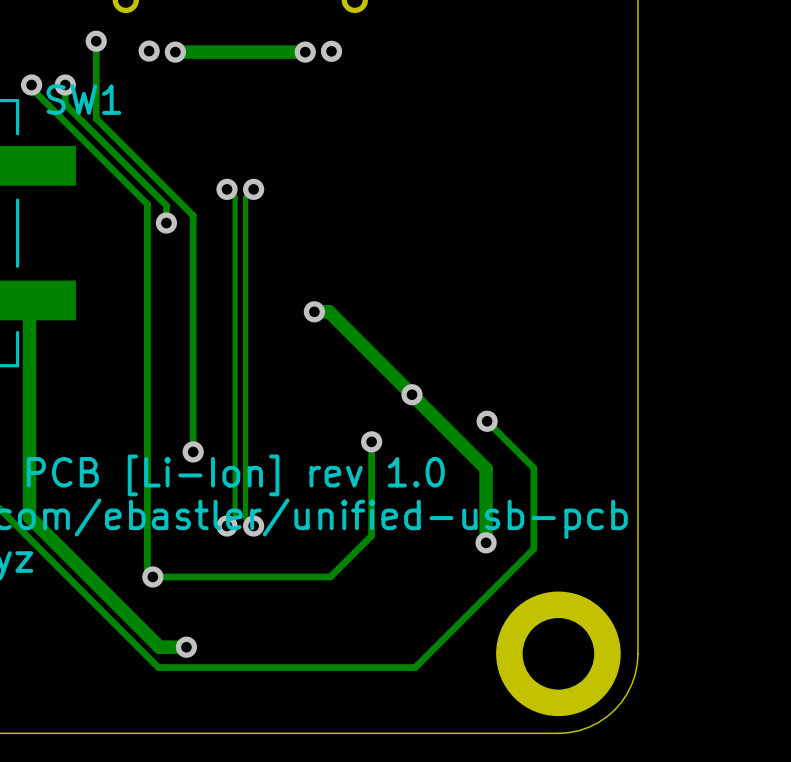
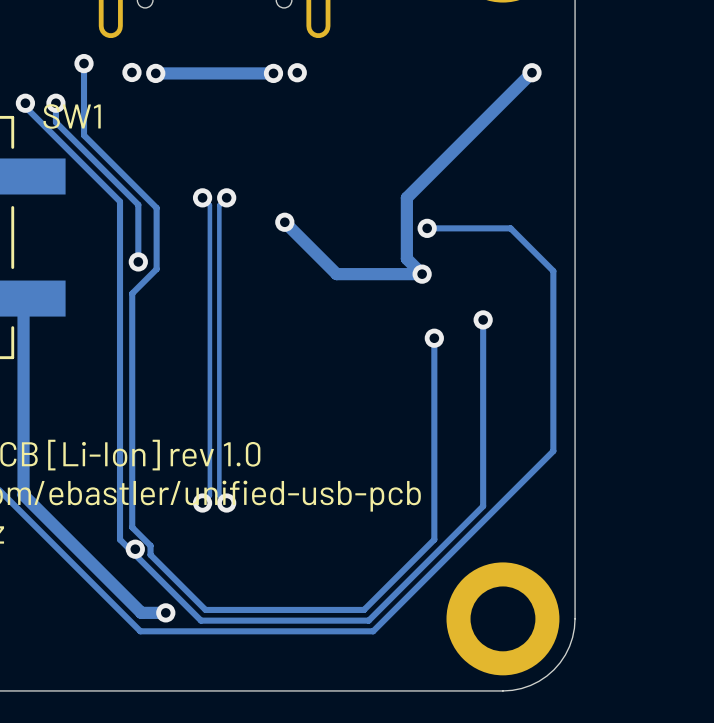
track: none -> (531, 72) (406, 197) (406, 258) (422, 274) (336, 274) (284, 222)
via: none -> (531, 72)
track: (31, 88) (147, 204) (147, 571) (152, 576) (330, 576) (371, 535) (371, 441) -> (25, 106) (120, 201) (120, 539) (201, 620) (368, 620) (483, 506) (483, 319)
track: (65, 104) (166, 205) (166, 223) -> (55, 120) (138, 204) (138, 261)
track: (96, 118) (193, 215) (193, 451) -> (84, 133) (156, 207) (156, 269) (132, 293) (132, 527) (150, 545) (150, 554) (205, 609) (364, 609) (434, 539) (434, 338)
via: none -> (284, 222)
via position: (166, 223) -> (138, 261)
via: none -> (427, 228)
via: none -> (422, 274)
track: (314, 311) (329, 311) (486, 468) (486, 542) -> none
via: (314, 311) -> none
via: none -> (483, 319)
via: none -> (434, 338)
via: (412, 394) -> none
track: (487, 421) (533, 468) (533, 548) -> (427, 228) (510, 228) (553, 271) (553, 451) (480, 523)
via: (487, 421) -> none
via: (371, 441) -> none
via: (193, 451) -> none
via: (486, 542) -> none

